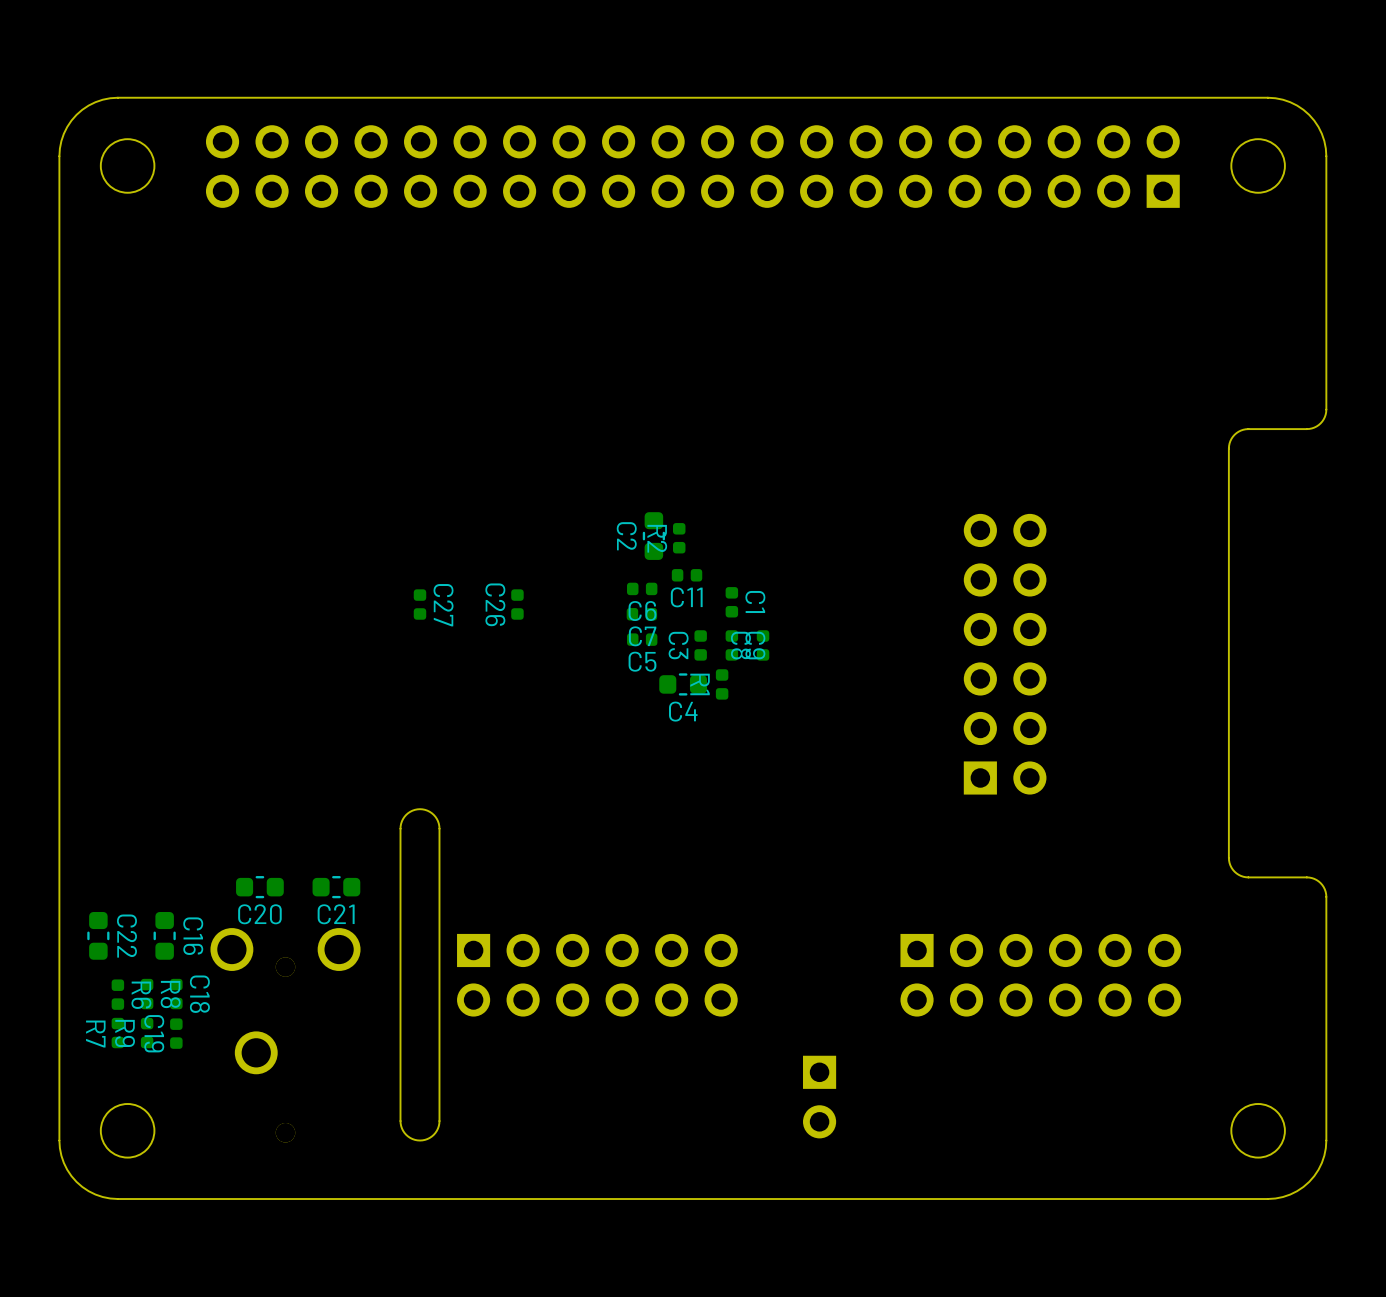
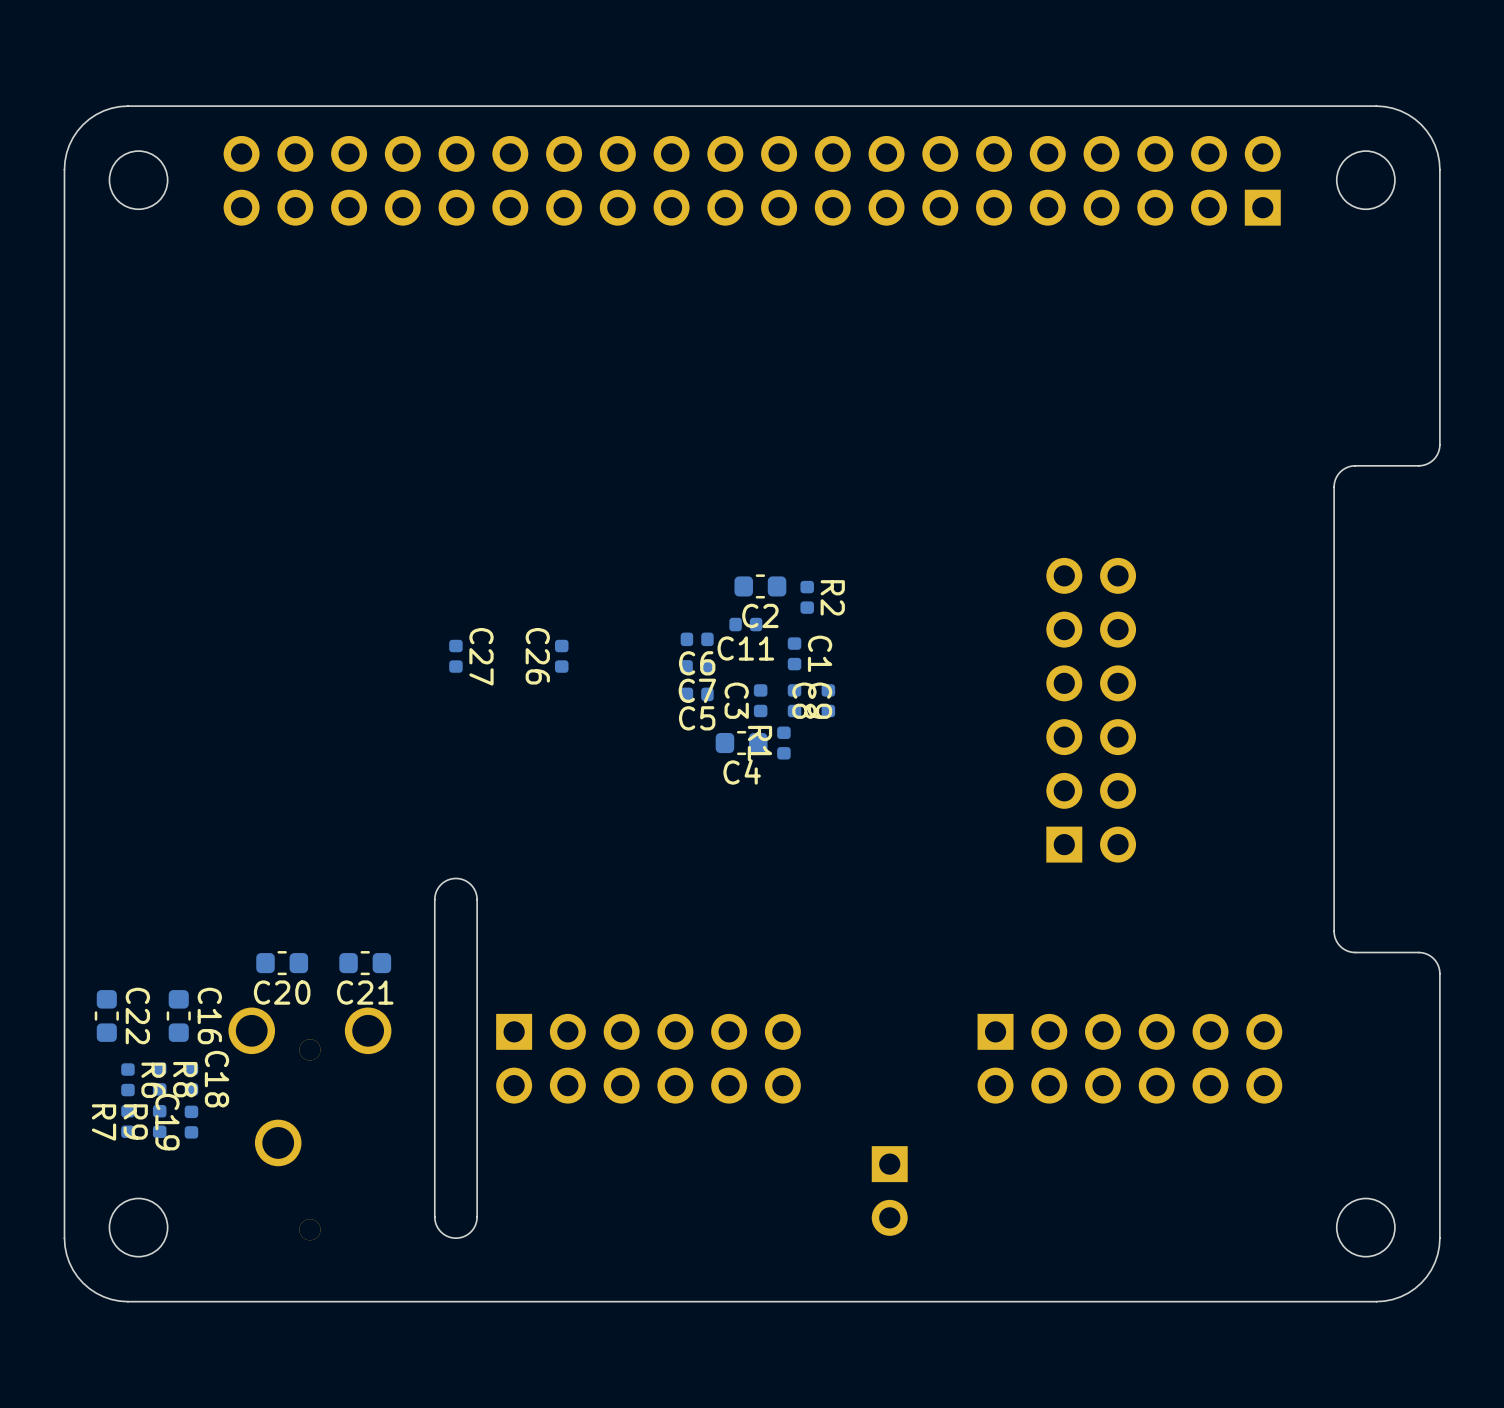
C2 name position: C2 (626, 536) -> C2 (760, 615)
C2 rotation: 0° (653, 536) -> 90° clockwise (760, 586)
C2 position: (653, 536) -> (760, 586)
R2 name position: R2 (657, 538) -> R2 (832, 597)
R2 position: (679, 538) -> (807, 597)

